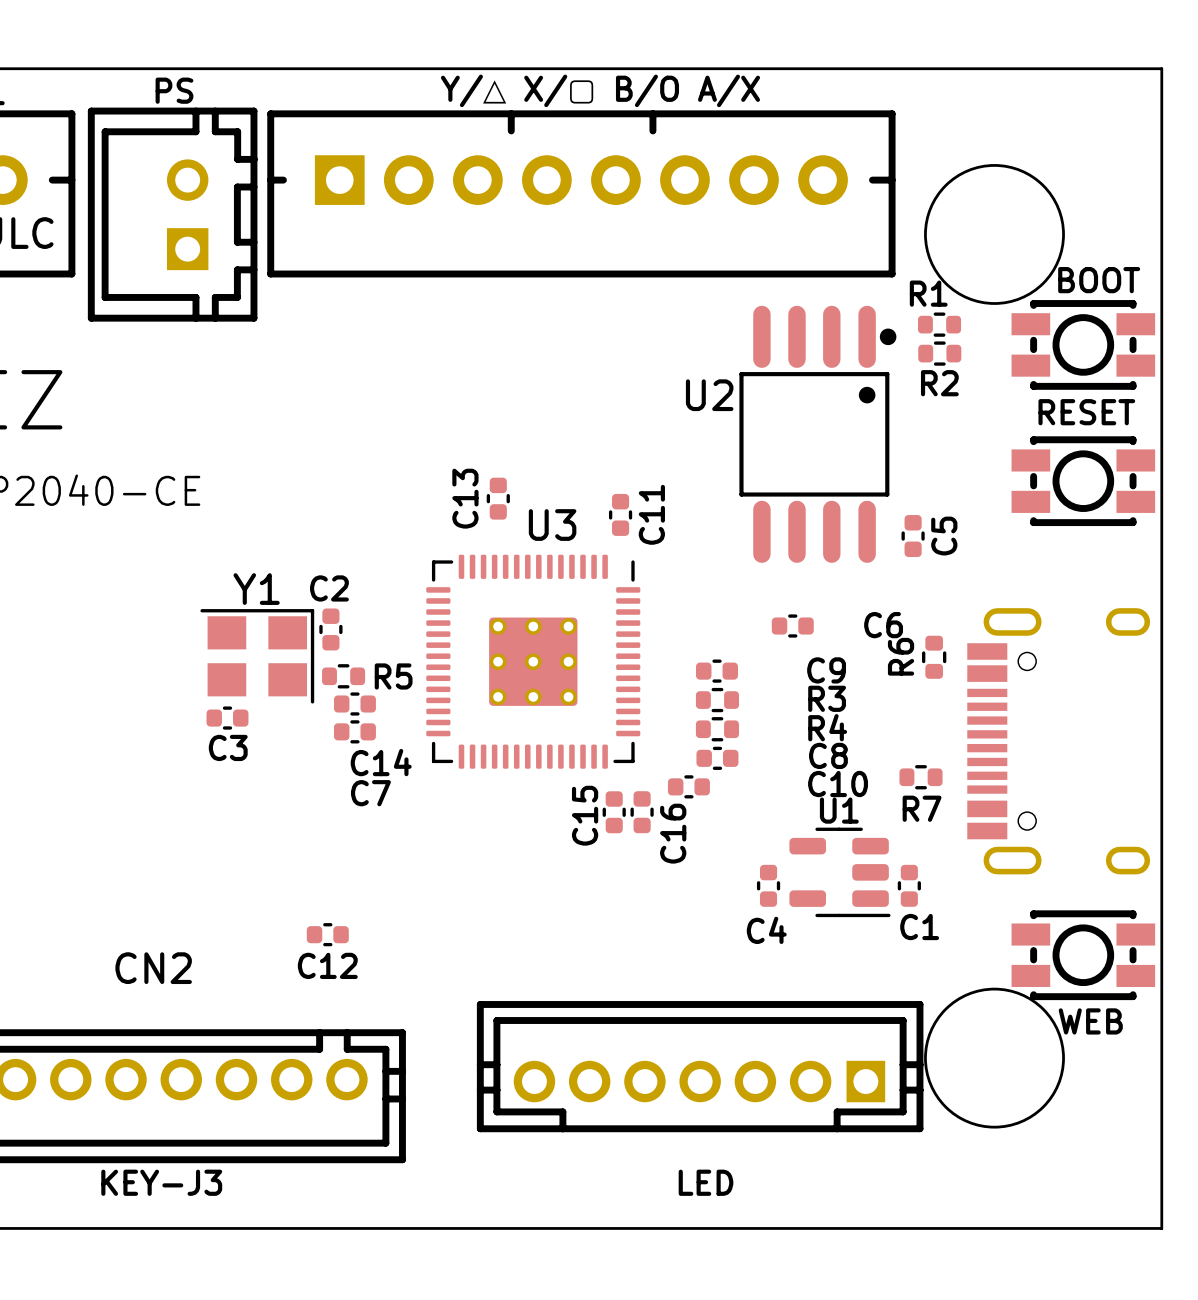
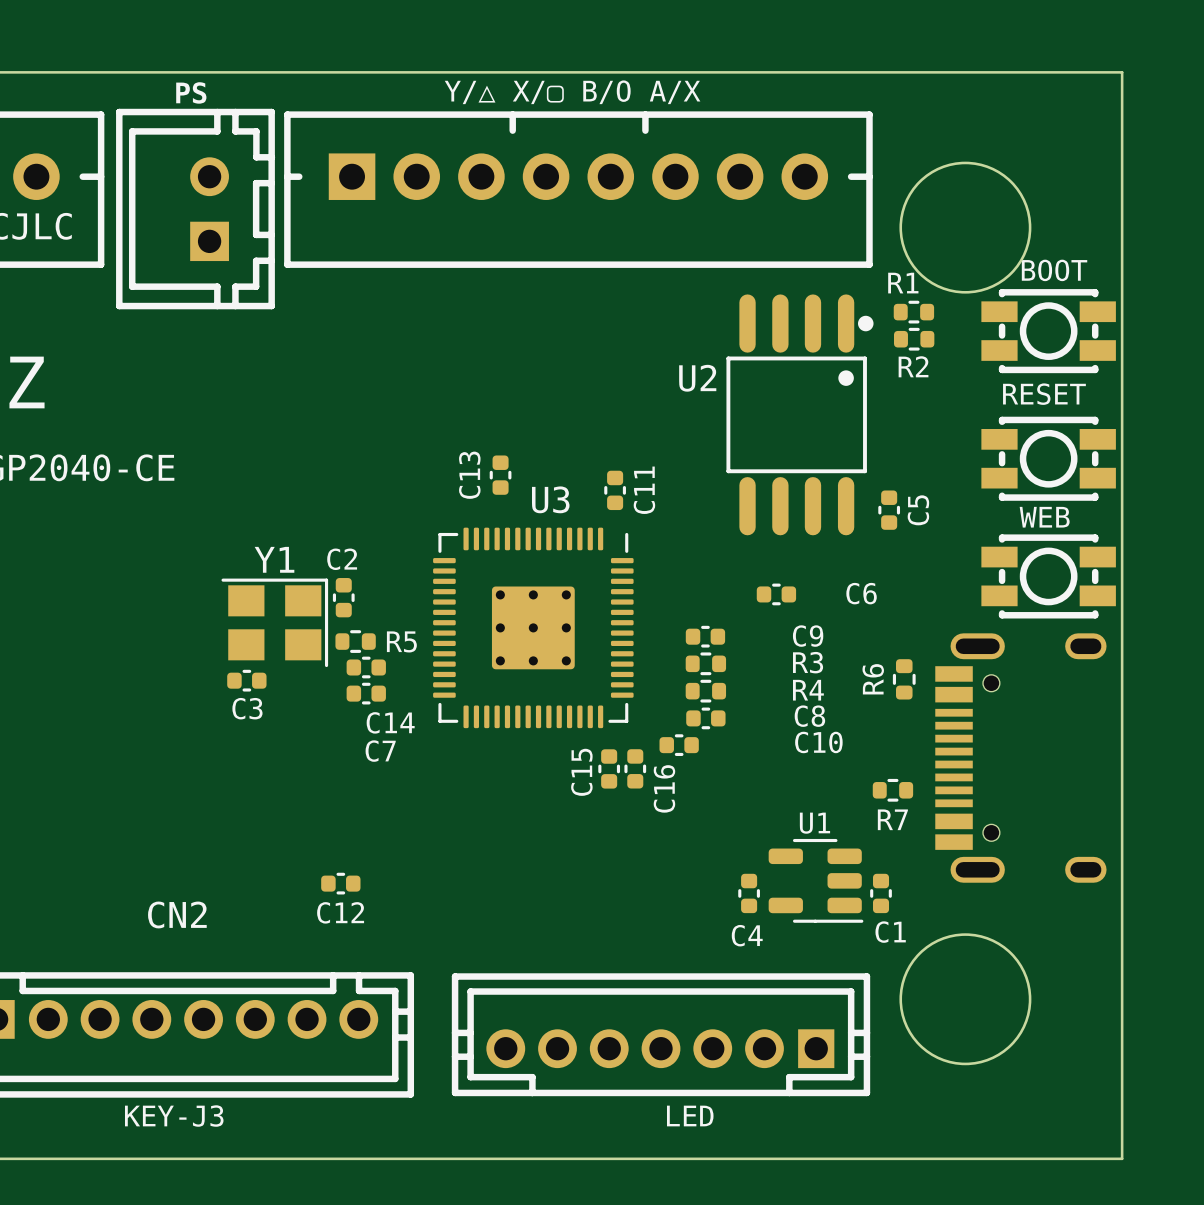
R6 position: (934, 657) -> (904, 679)
part position: (1058, 741) -> (1020, 758)
R7 position: (921, 777) -> (892, 790)
U1 position: (839, 872) -> (816, 880)
C4 position: (768, 885) -> (749, 893)
C1 position: (909, 885) -> (881, 893)
part position: (1083, 955) -> (1048, 576)
text position: WEB (1090, 1021) -> WEB (1044, 517)
part position: (700, 1066) -> (661, 1034)

